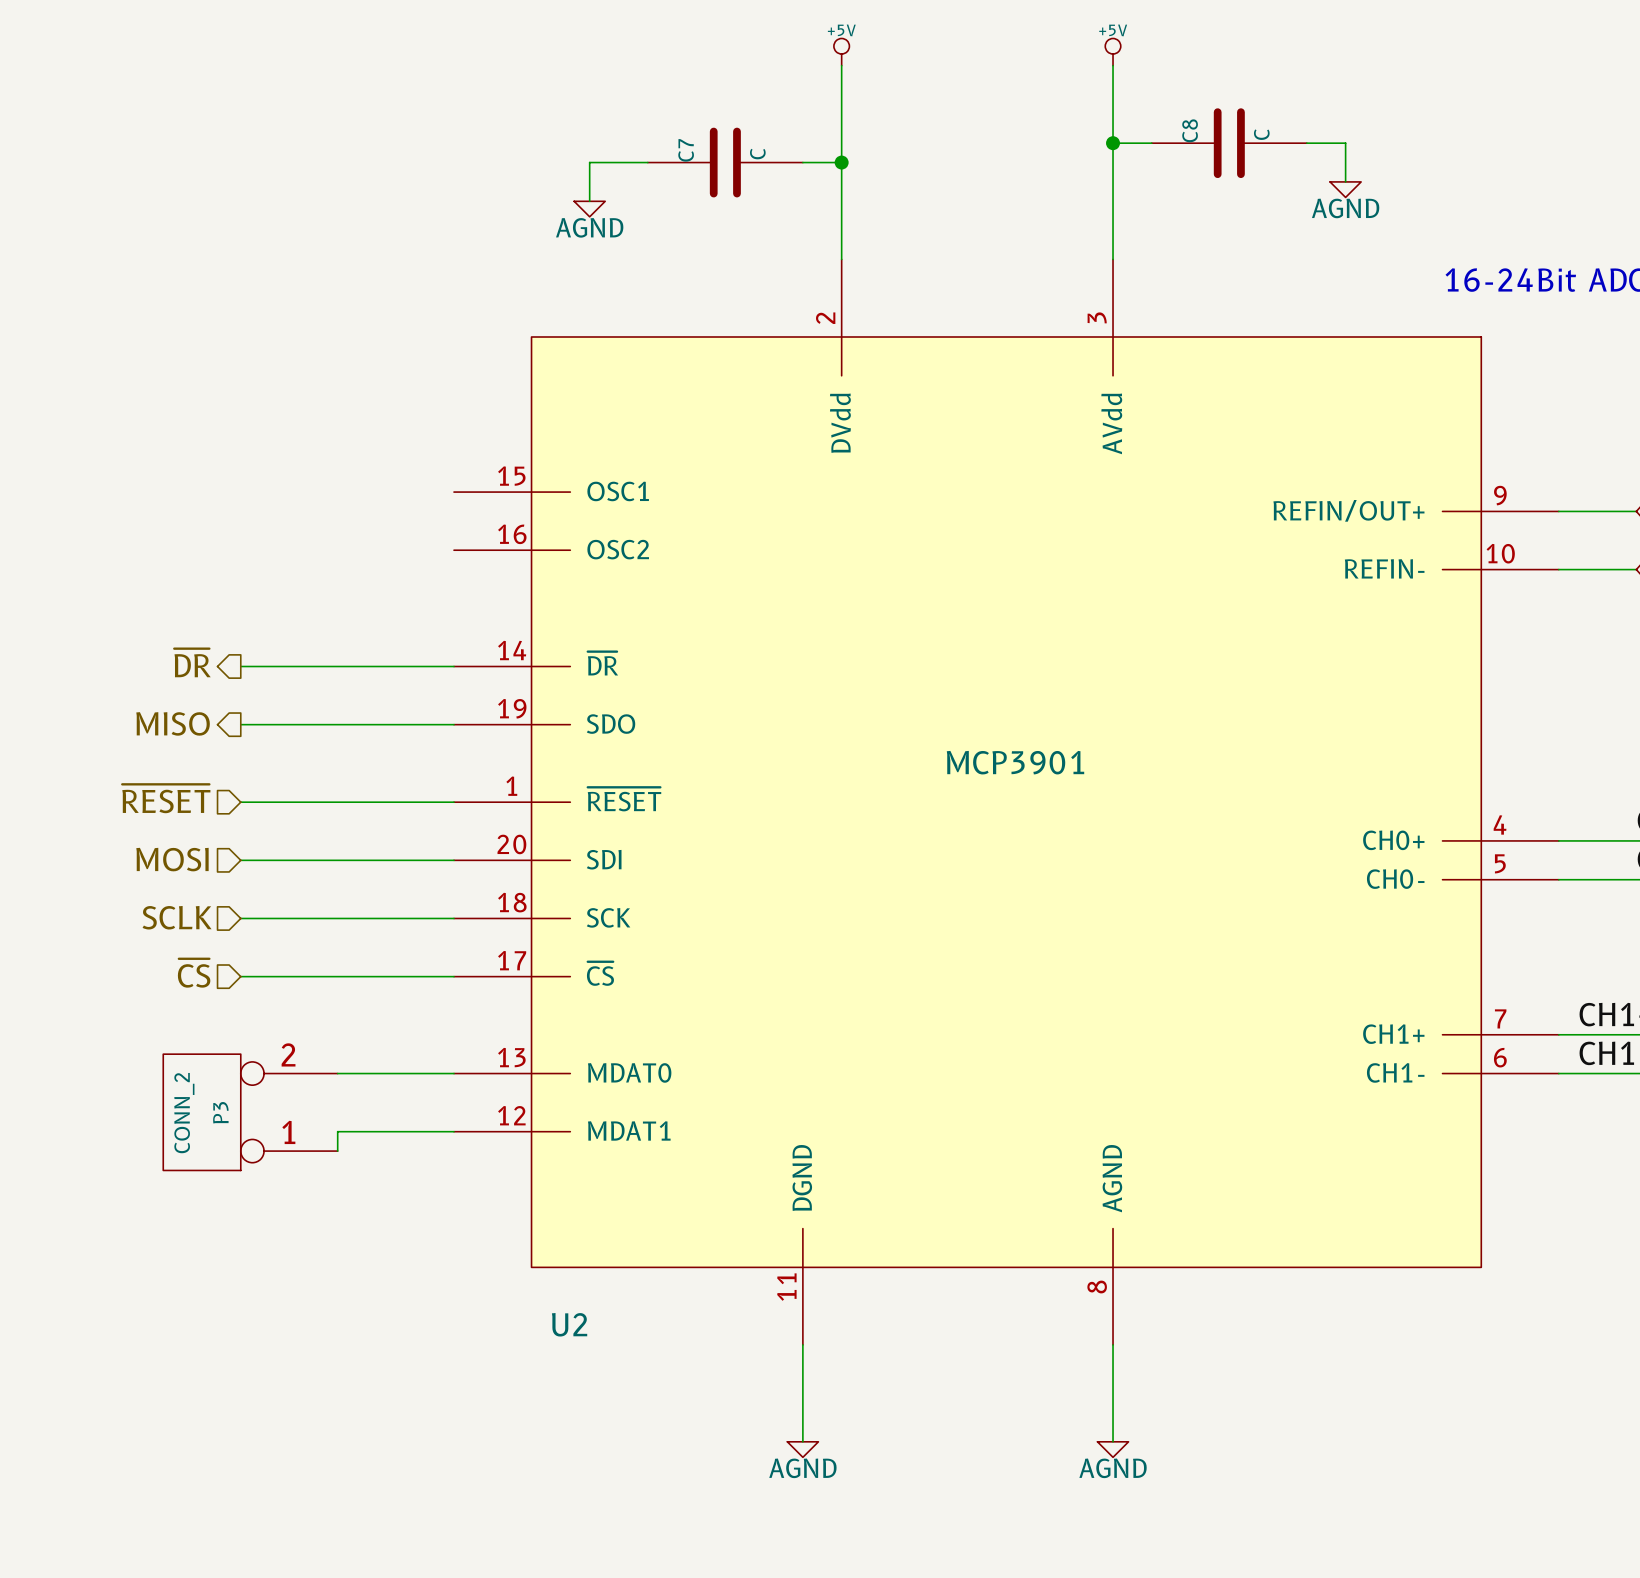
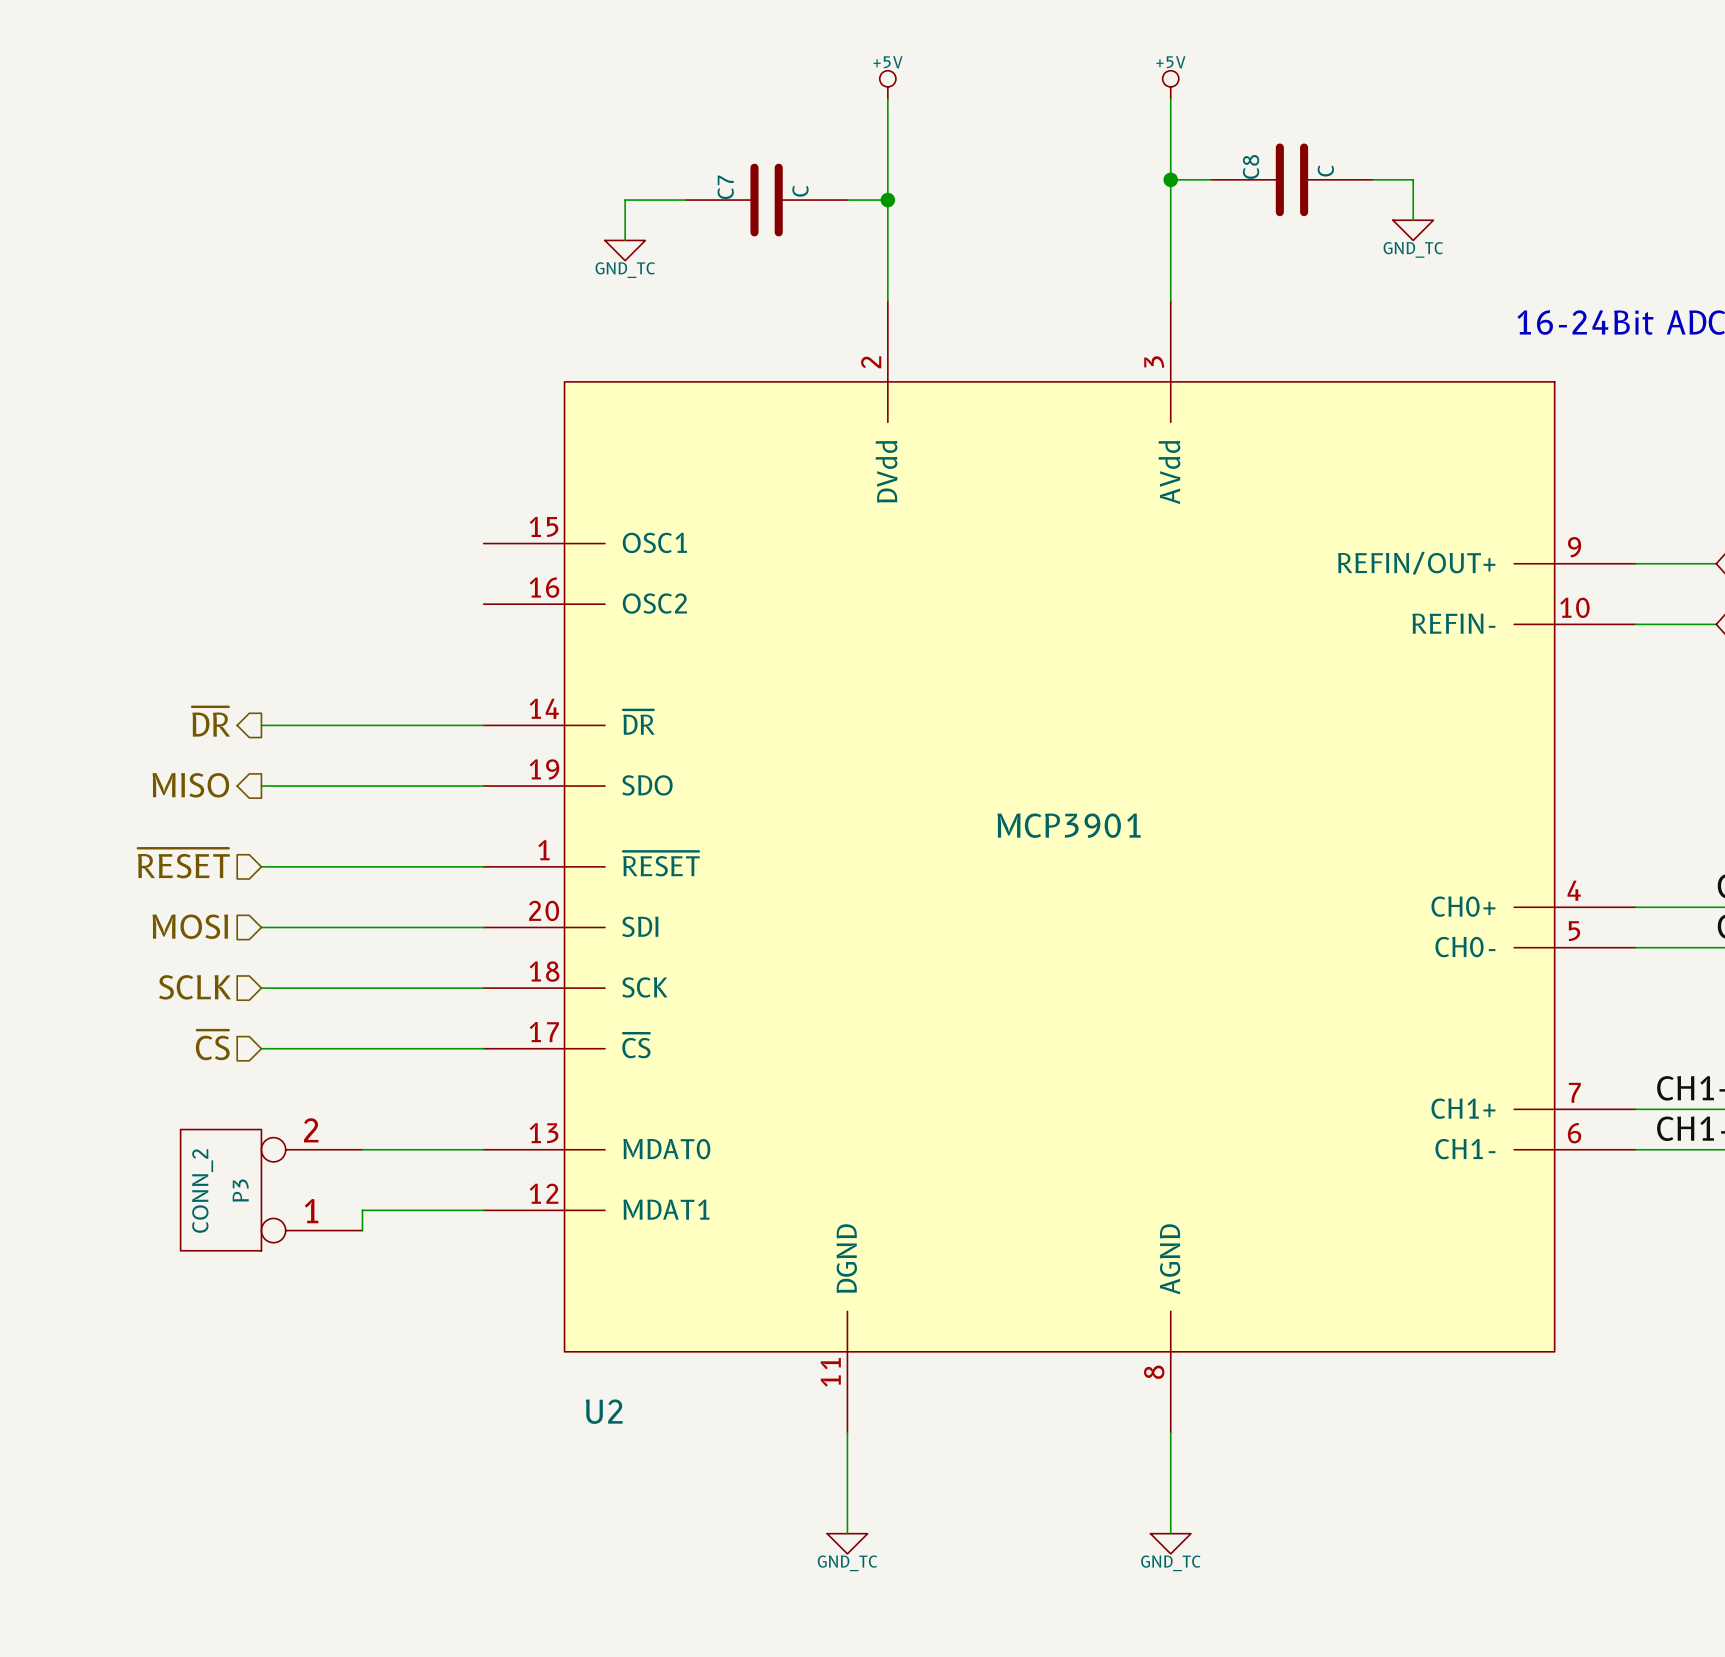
power symbol: AGND (1345, 189) -> GND_TC (1413, 230)
power symbol: AGND (589, 209) -> GND_TC (625, 250)
power symbol: AGND (802, 1449) -> GND_TC (847, 1543)
power symbol: AGND (1113, 1449) -> GND_TC (1170, 1543)

